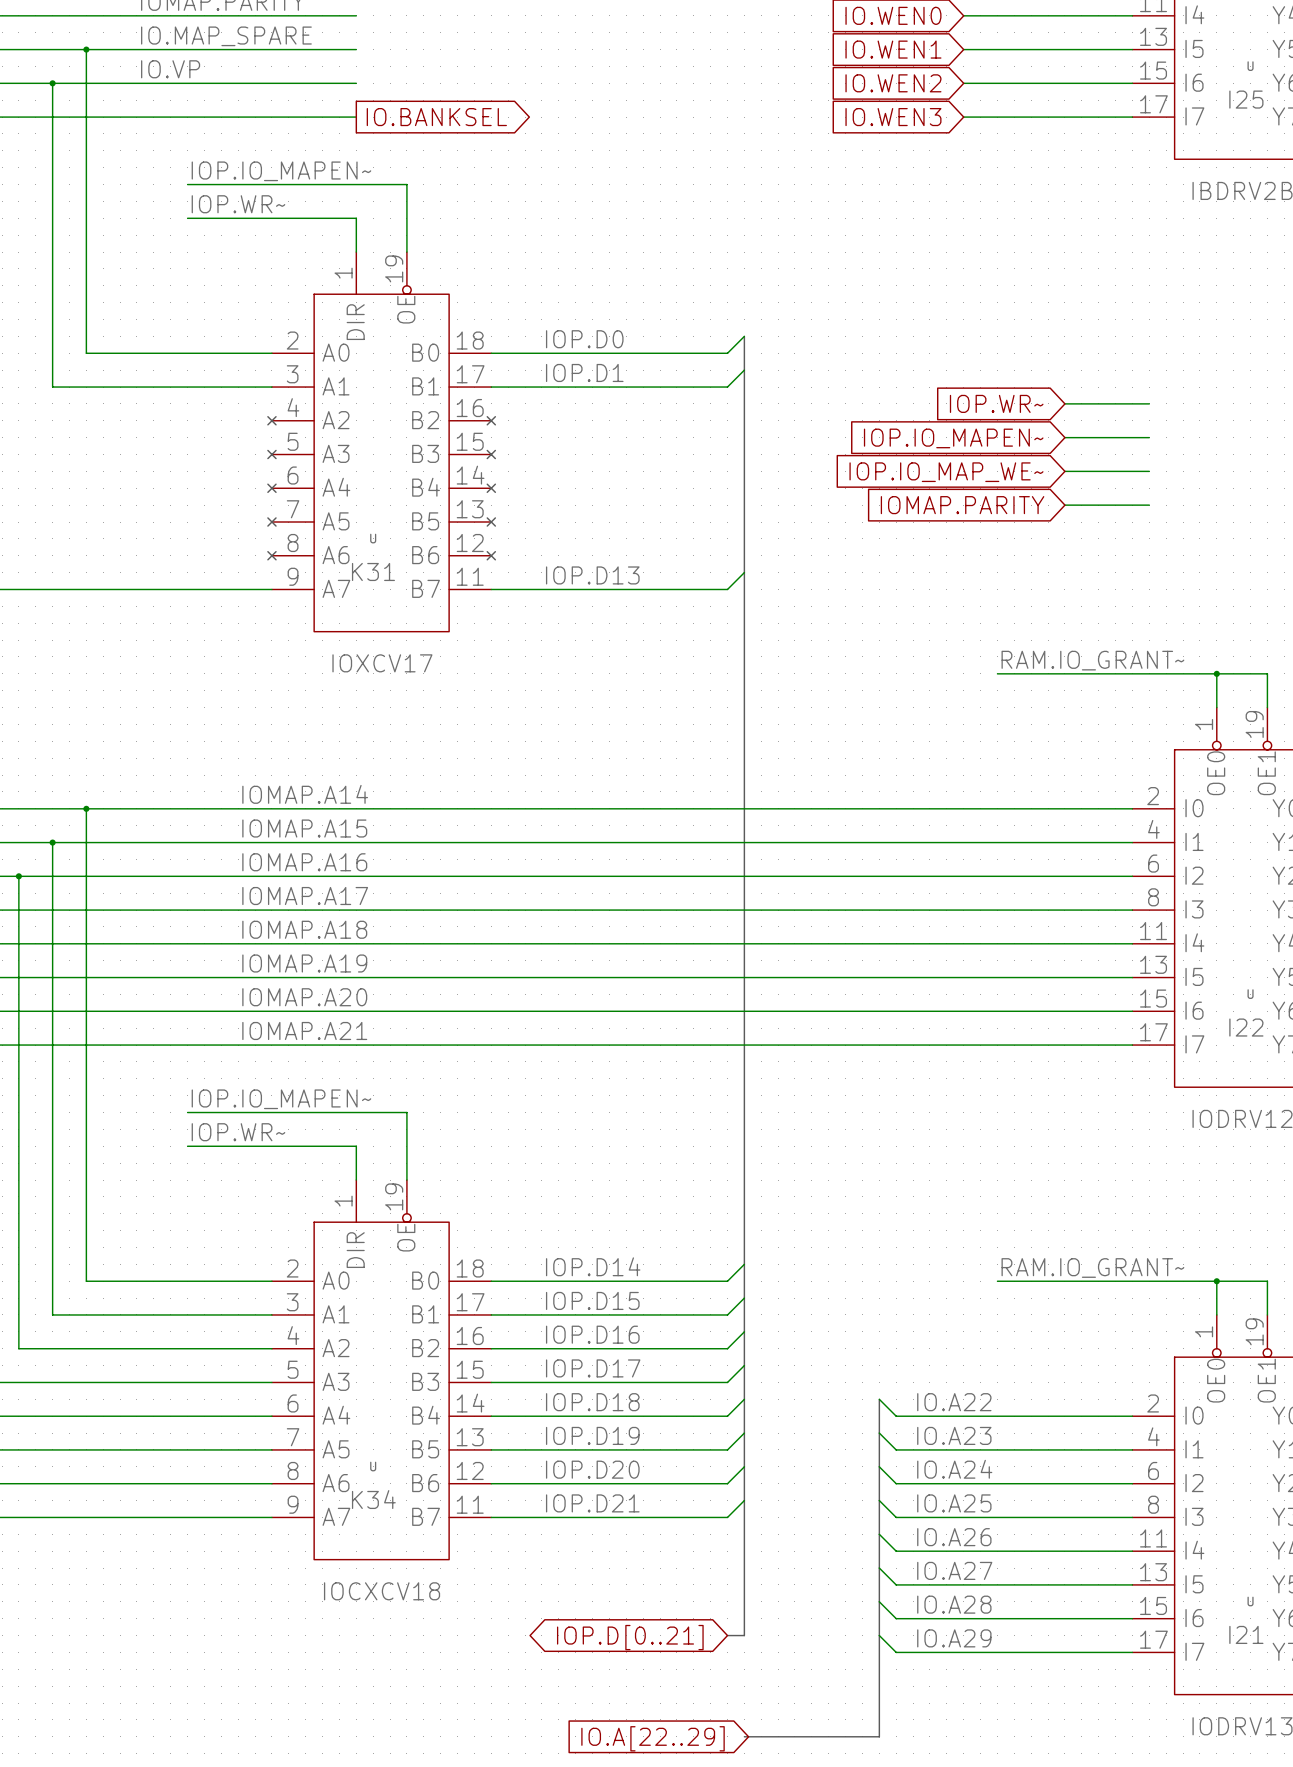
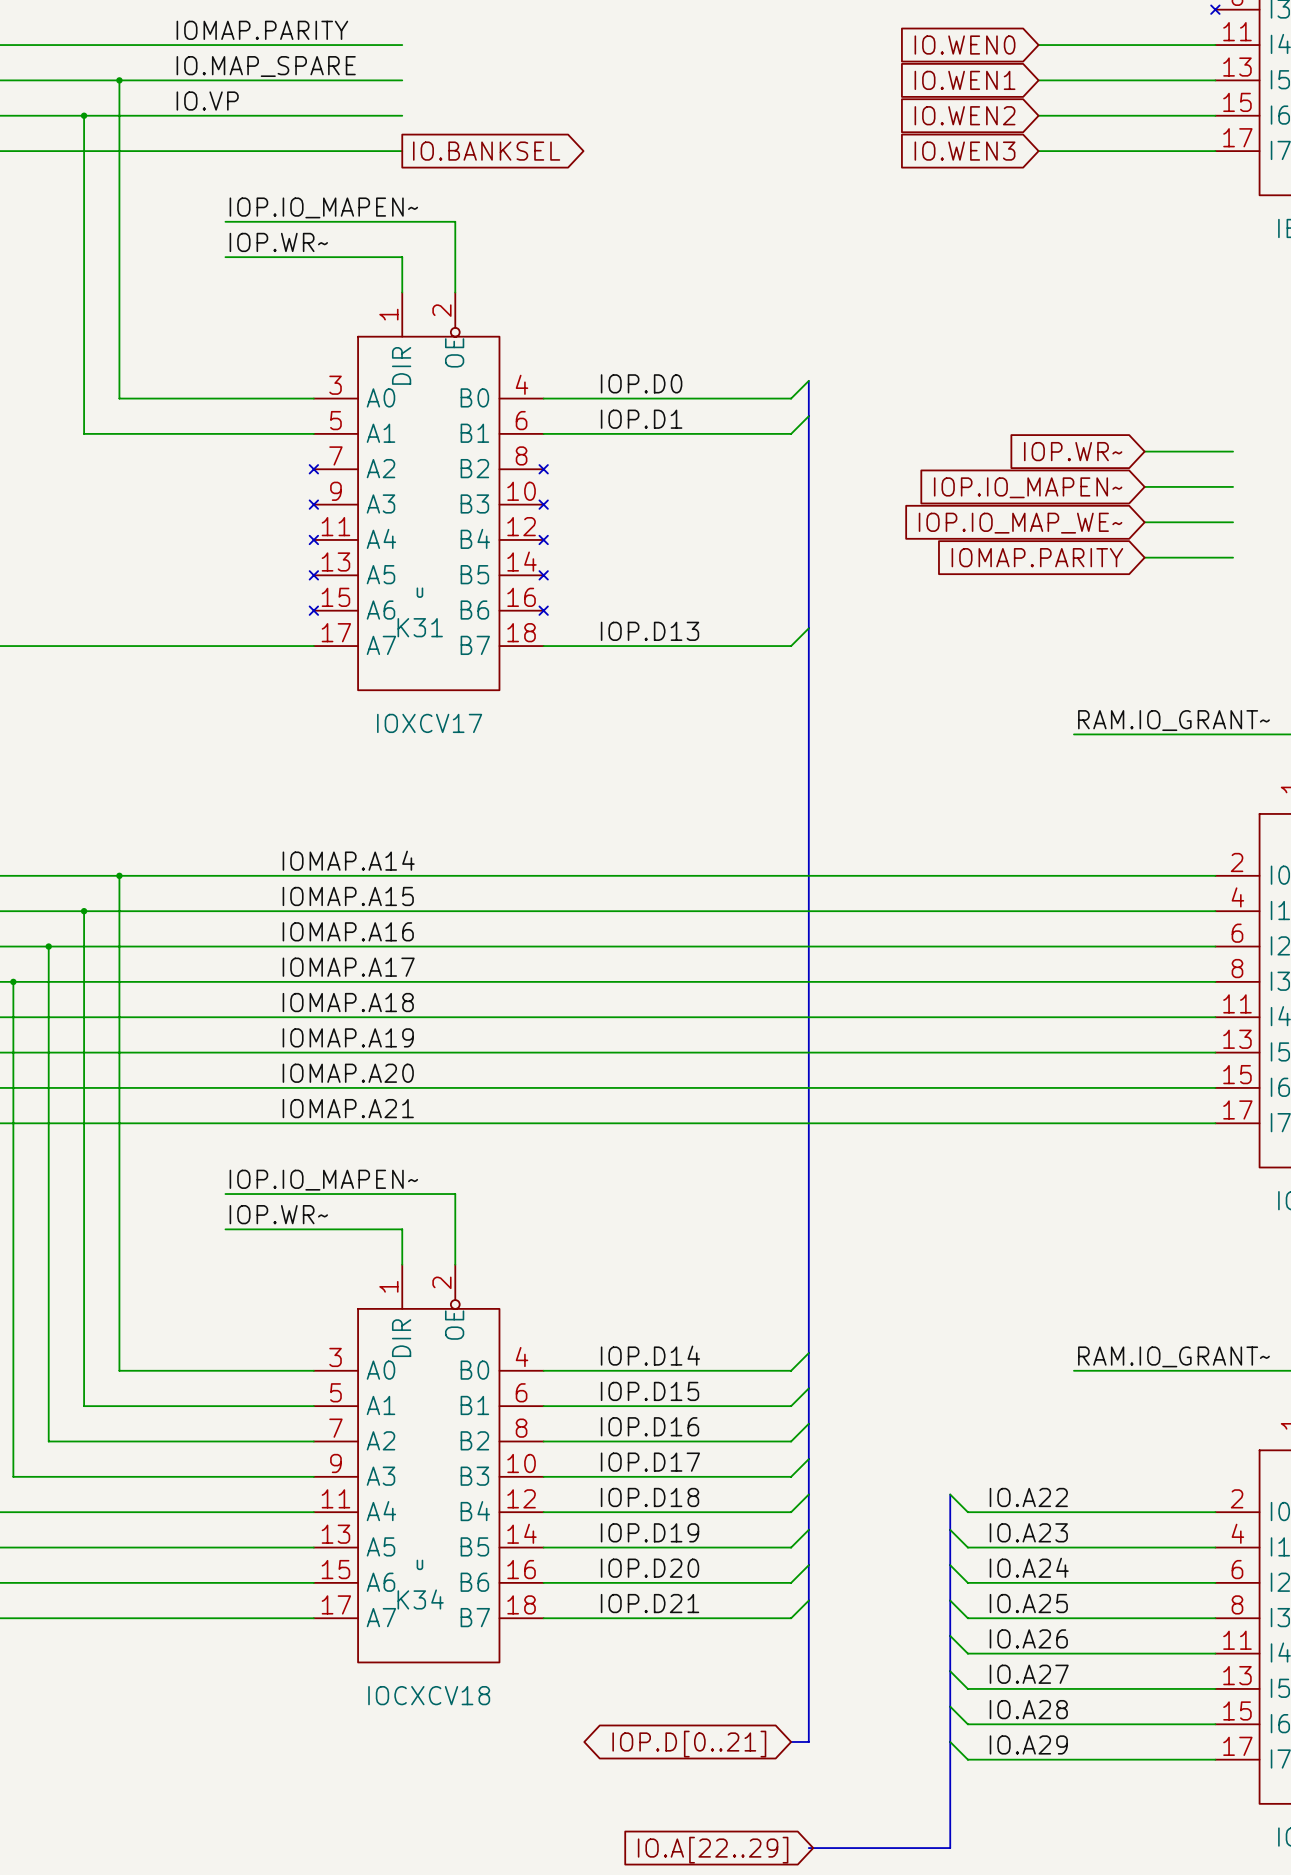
U symbol: [271, 252, 492, 632] -> [313, 292, 544, 691]
U symbol: [271, 1180, 492, 1560] -> [313, 1264, 544, 1663]

